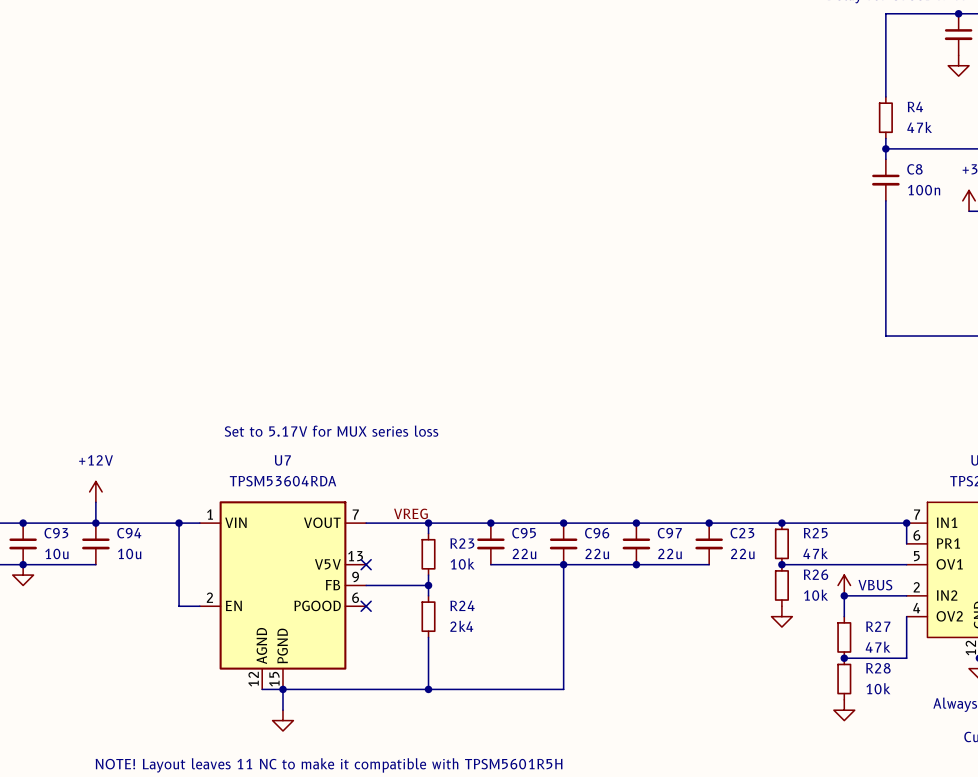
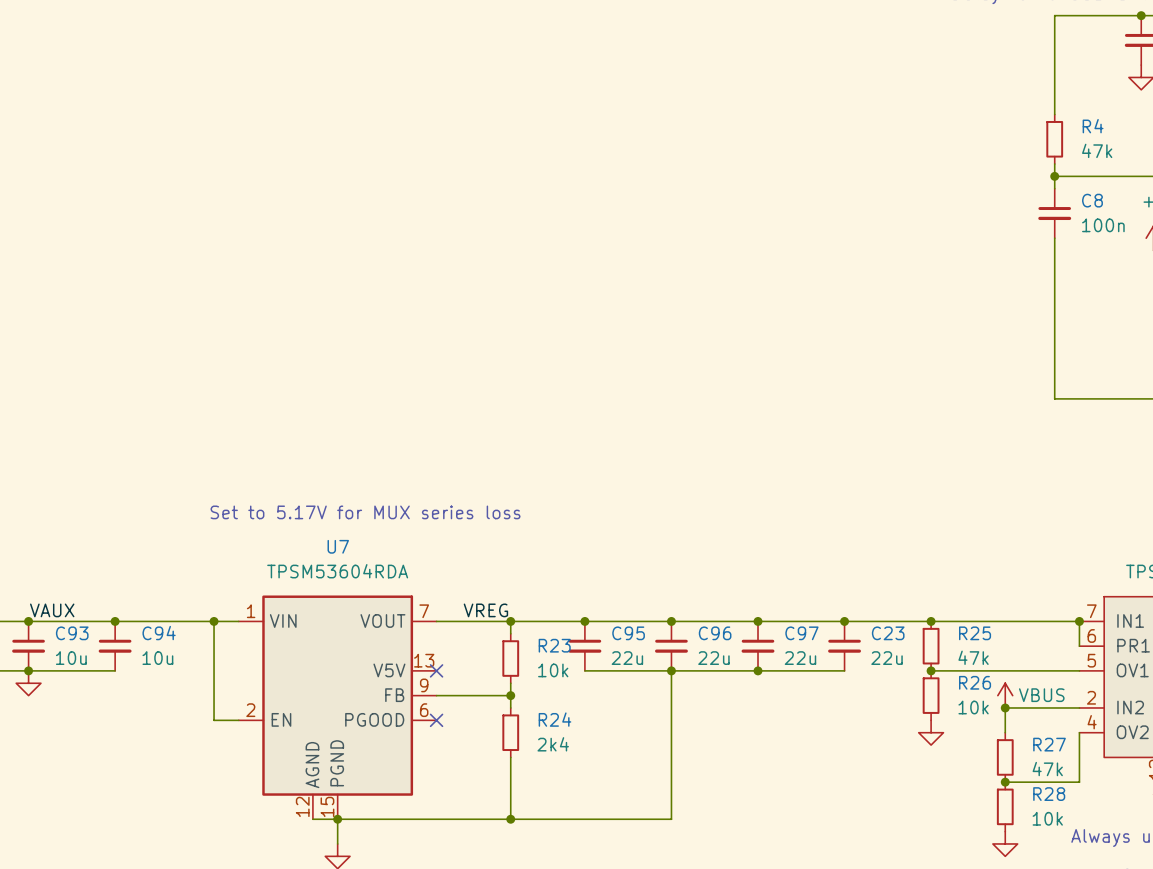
power symbol: +12V (95, 491) -> none
wire: (95, 502) (95, 523) -> none
label: none -> VAUX (52, 610)

